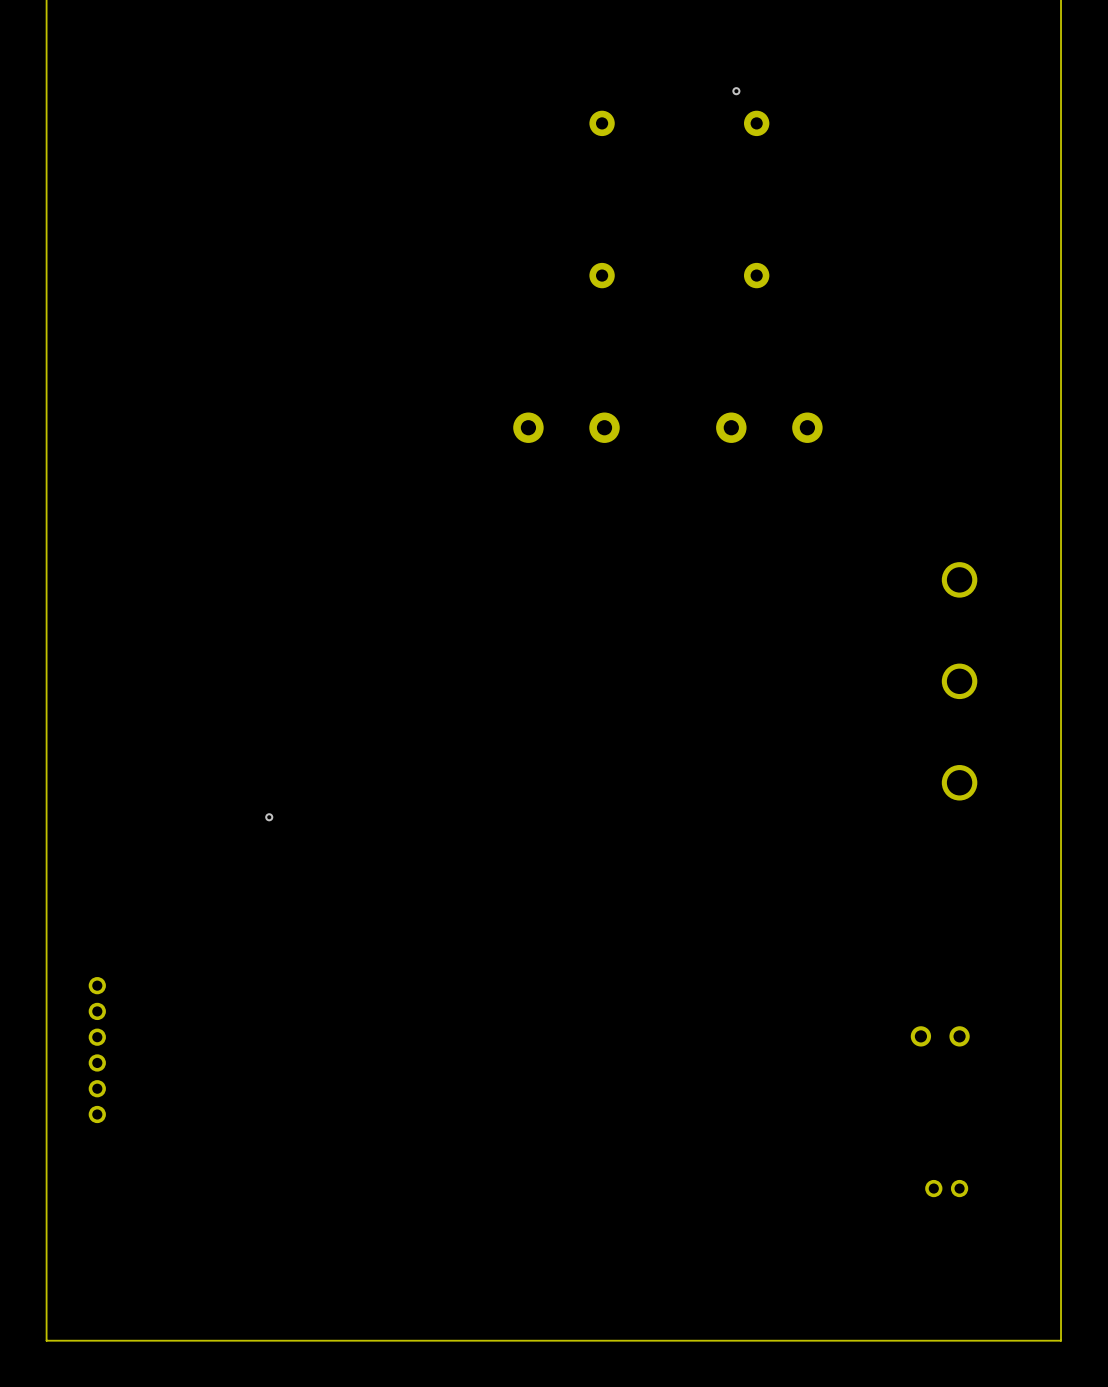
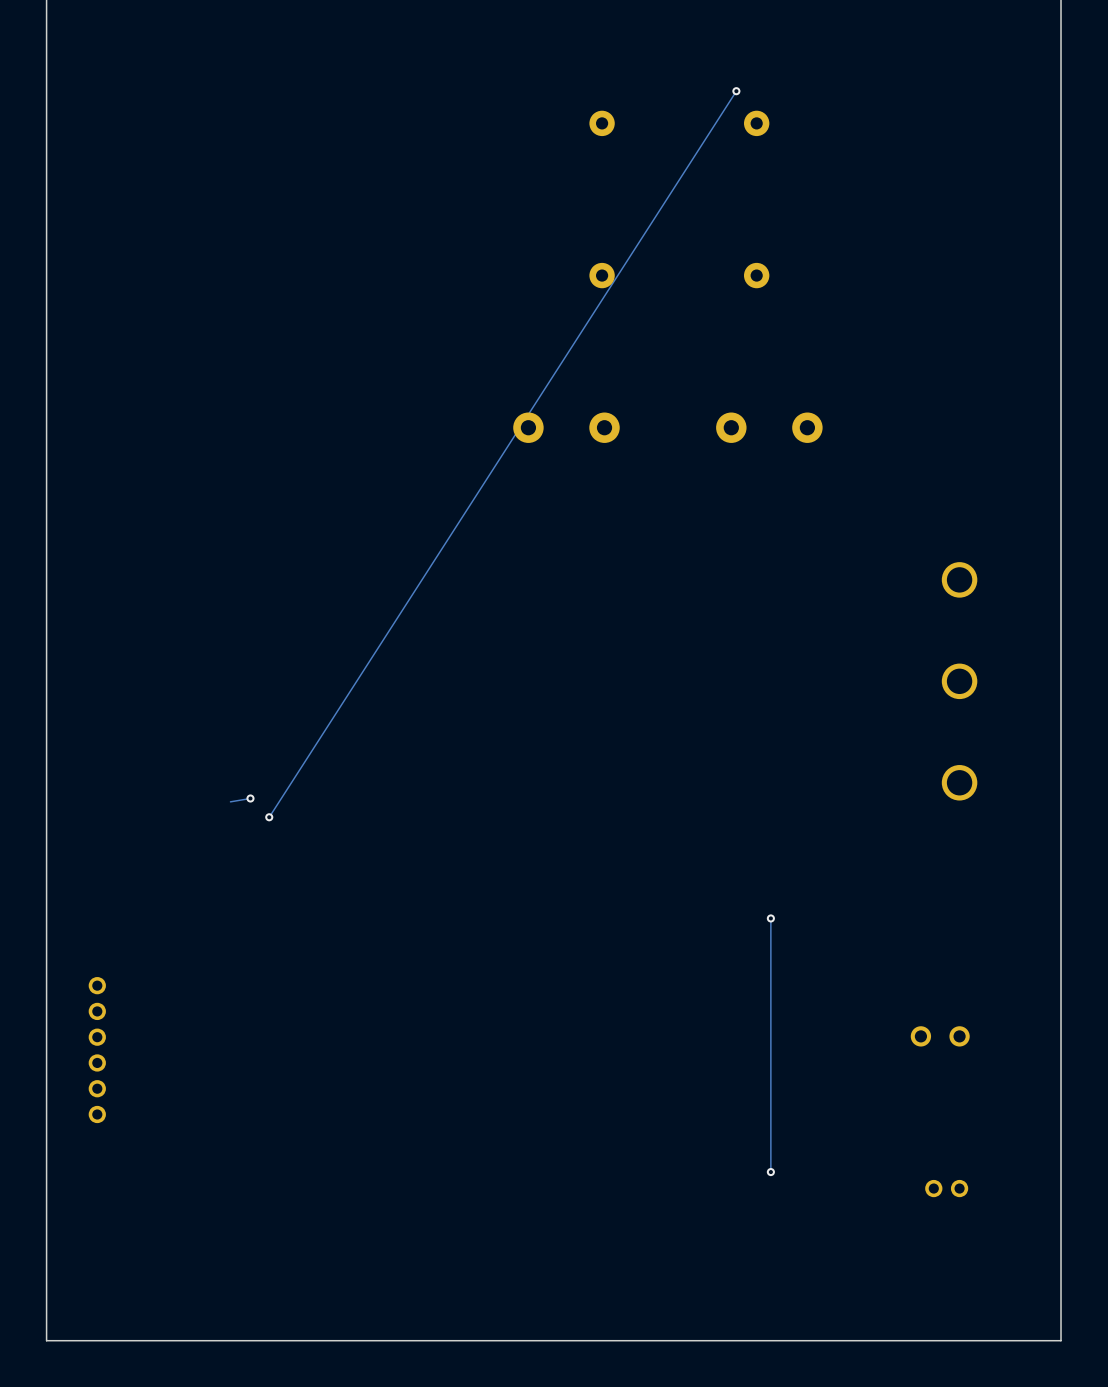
track: none -> (736, 91) (269, 817)
track: none -> (250, 798) (230, 801)
via: none -> (250, 798)
track: none -> (770, 918) (770, 1172)
via: none -> (770, 918)
via: none -> (770, 1172)

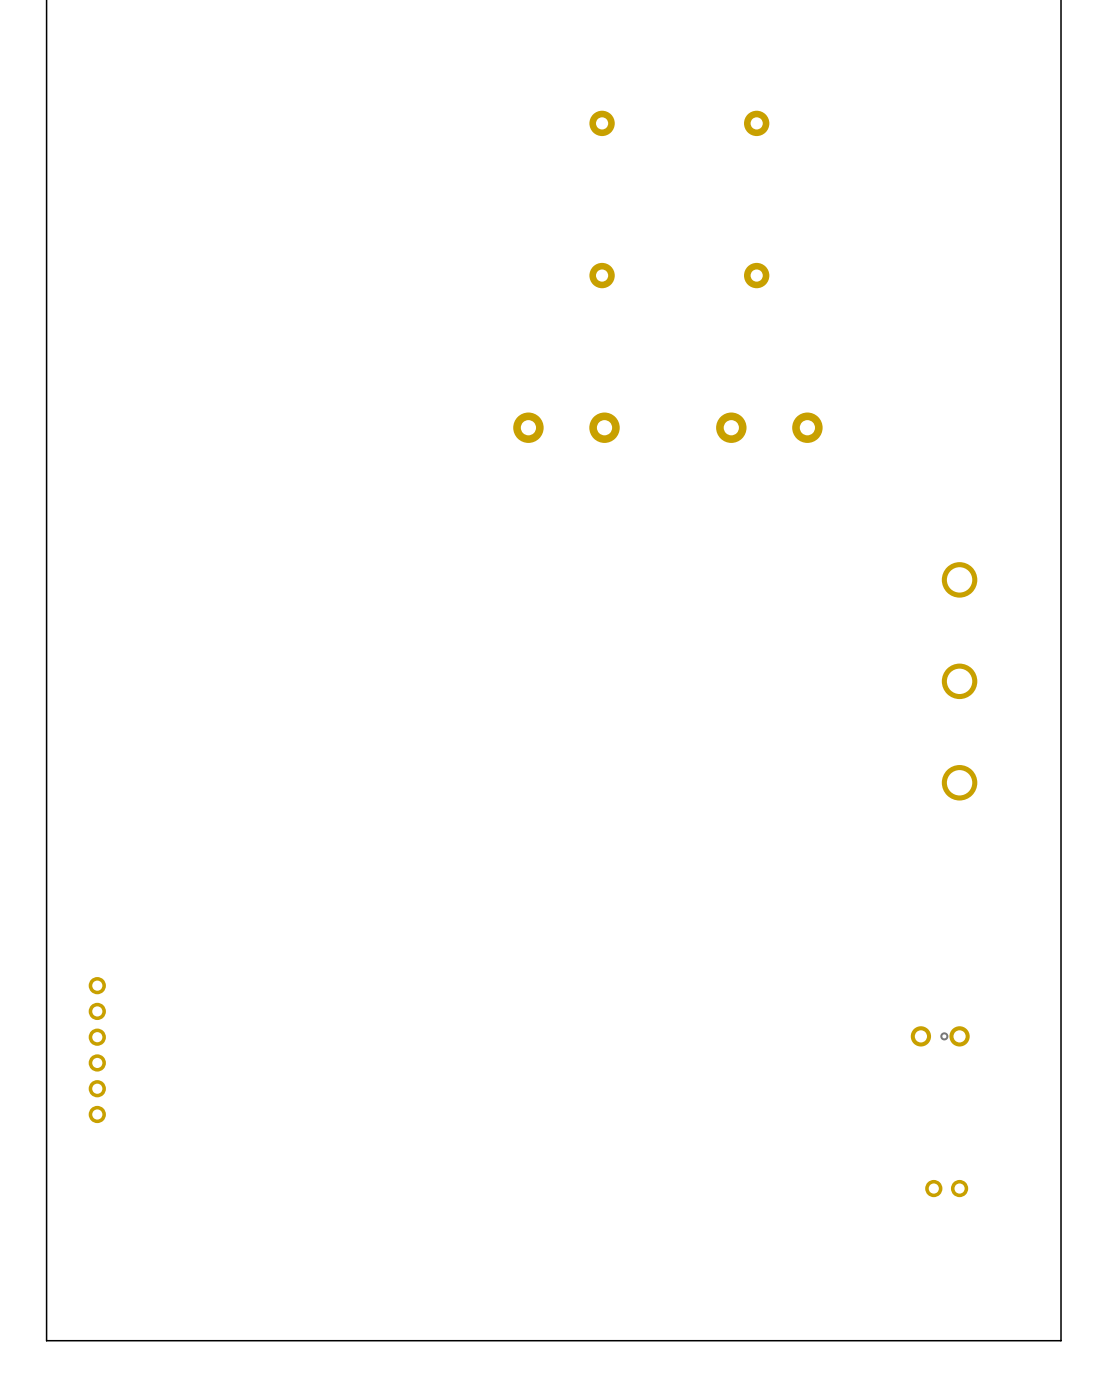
track: (736, 91) (269, 817) -> none
via: (736, 91) -> none
track: (250, 798) (230, 801) -> none
via: (250, 798) -> none
via: (269, 817) -> none
track: (770, 918) (770, 1172) -> none
via: (770, 918) -> none
via: none -> (944, 1036)
via: (770, 1172) -> none

